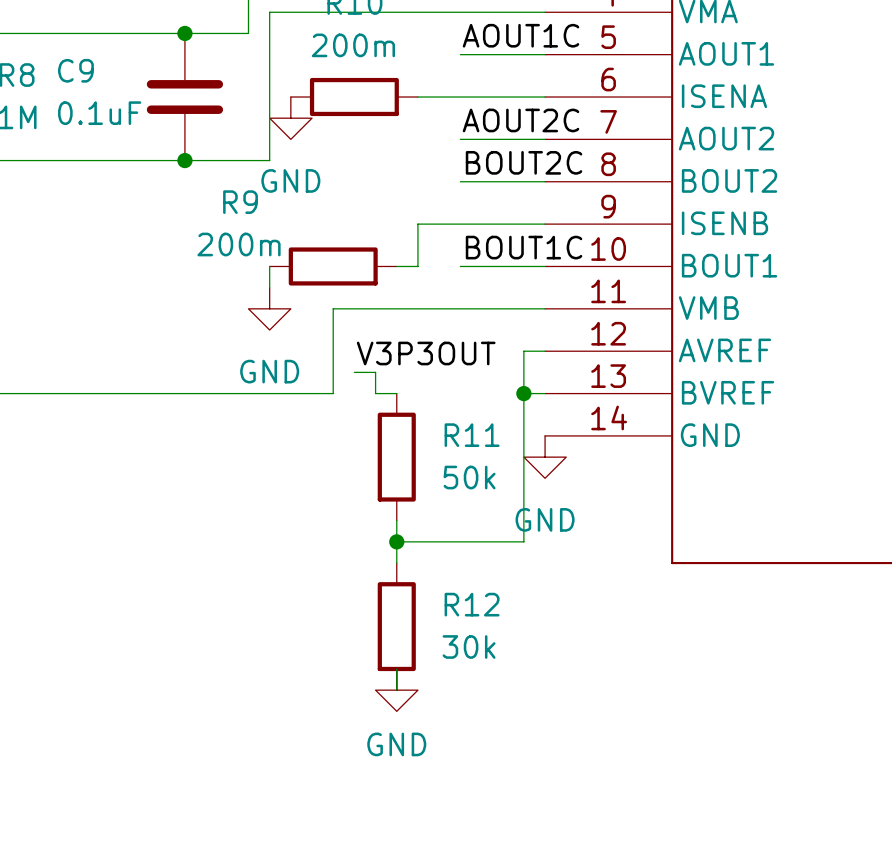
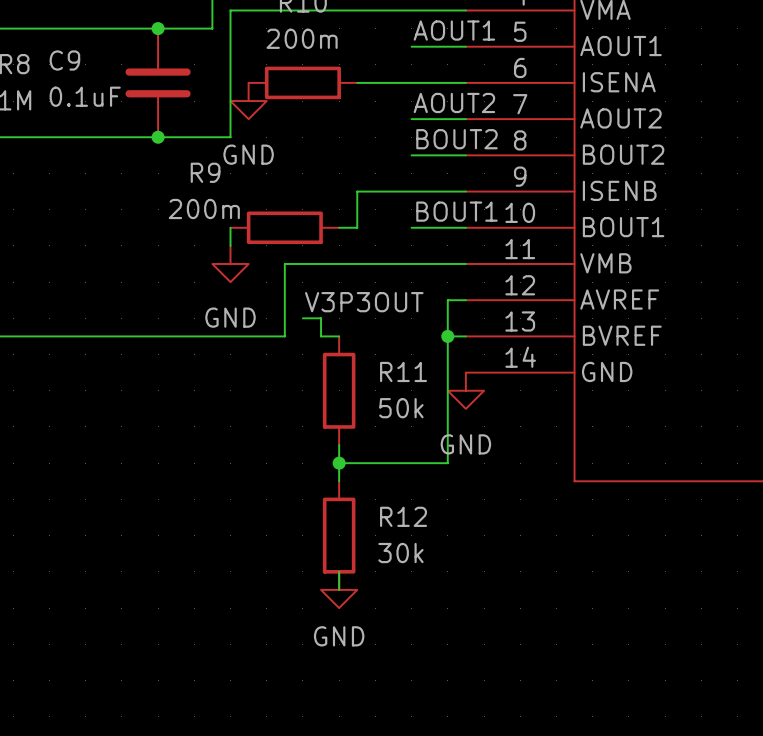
label: AOUT1C (521, 35) -> AOUT1 (454, 30)
wire: (460, 54) (481, 54) -> none
label: AOUT2C (521, 120) -> AOUT2 (454, 102)
wire: (460, 139) (481, 139) -> none
label: BOUT2C (524, 162) -> BOUT2 (456, 139)
wire: (460, 181) (481, 181) -> none
label: BOUT1C (524, 247) -> BOUT1 (456, 211)
wire: (460, 266) (481, 266) -> none

